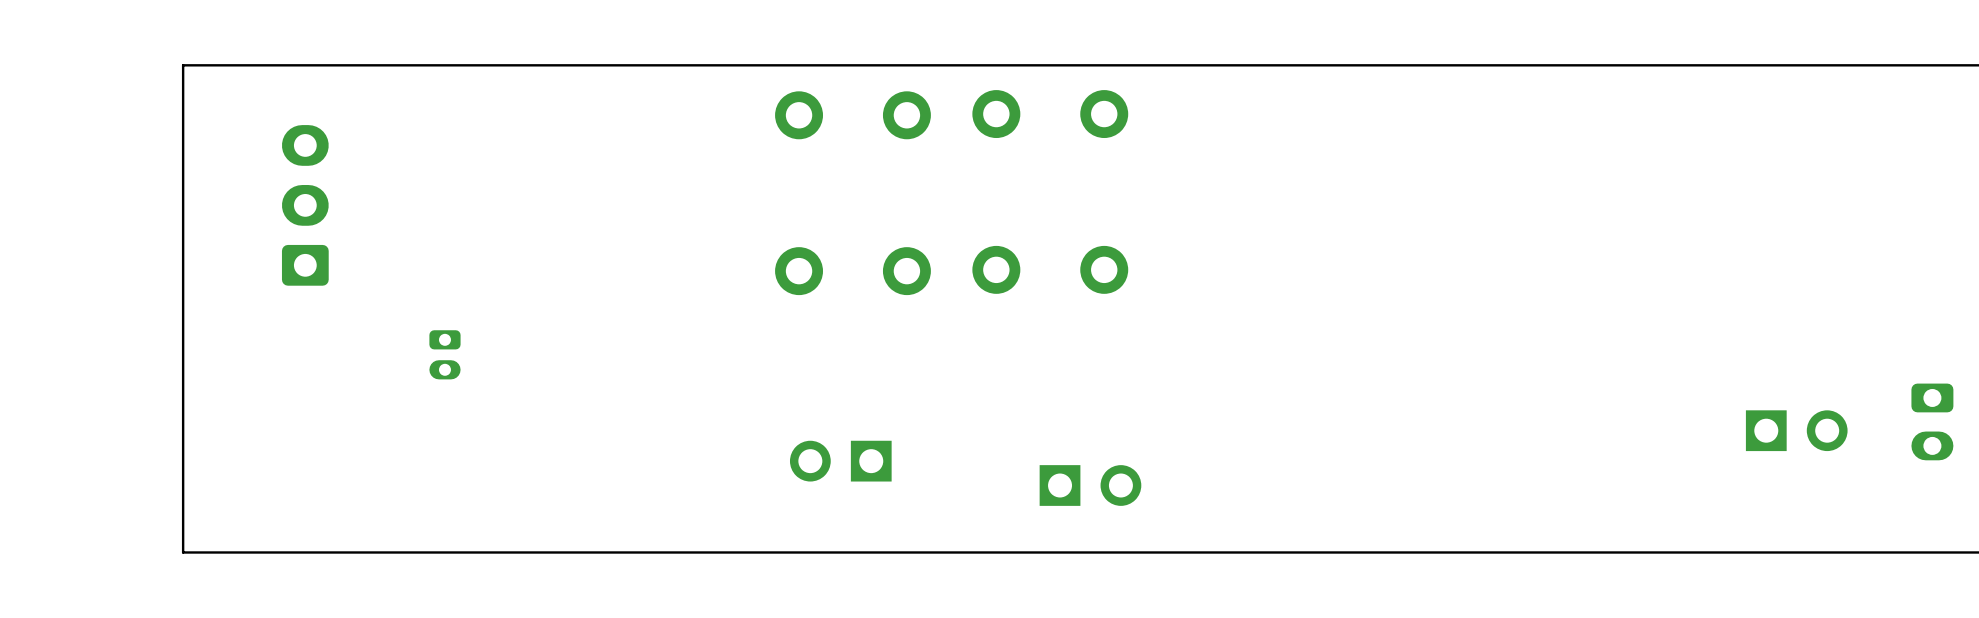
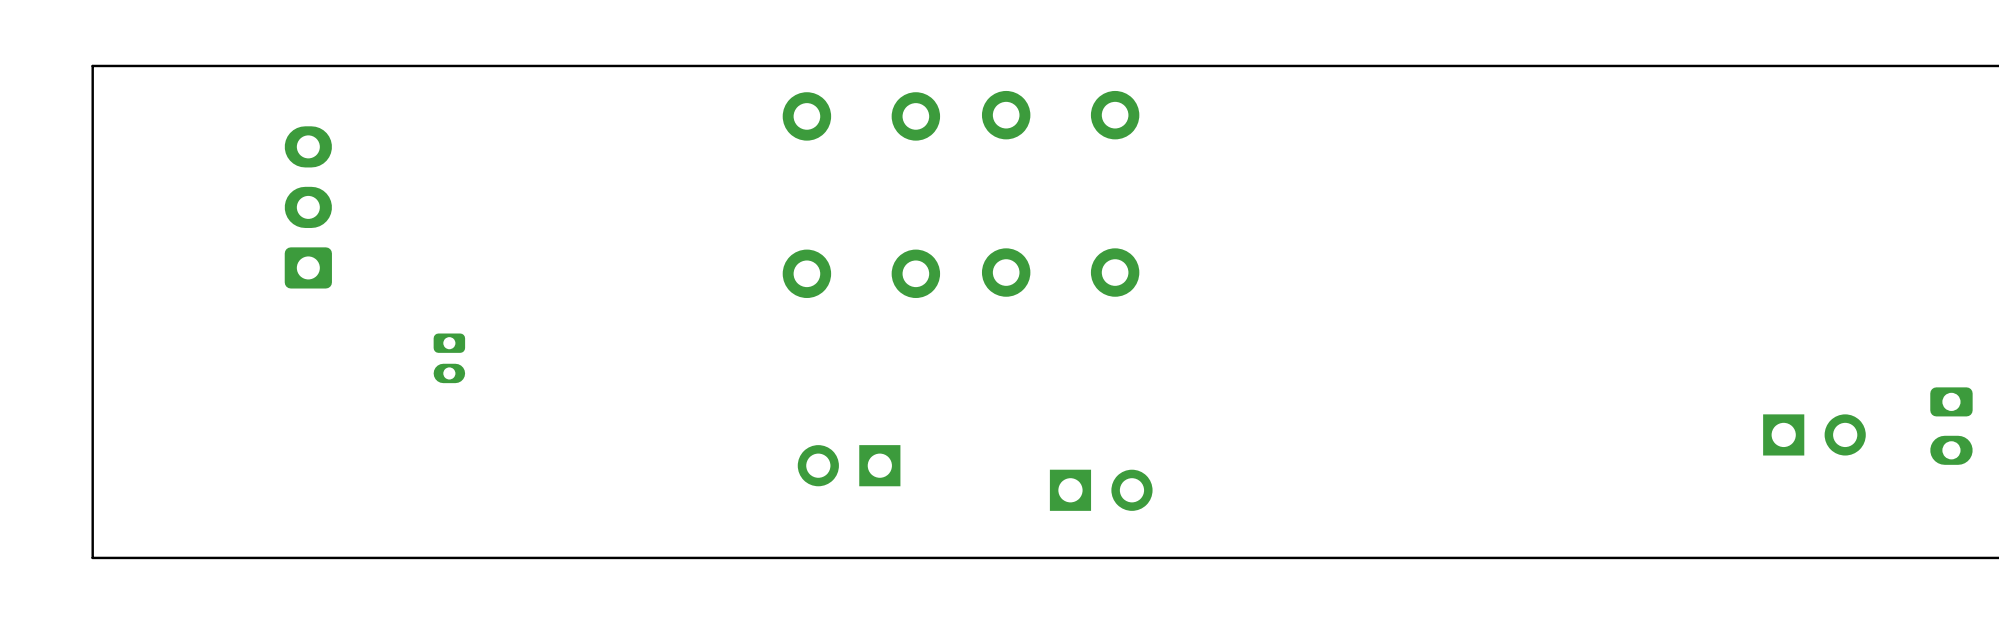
board edge: (183, 65) (183, 552) -> (184, 65) (92, 65) (92, 557) (184, 557)

